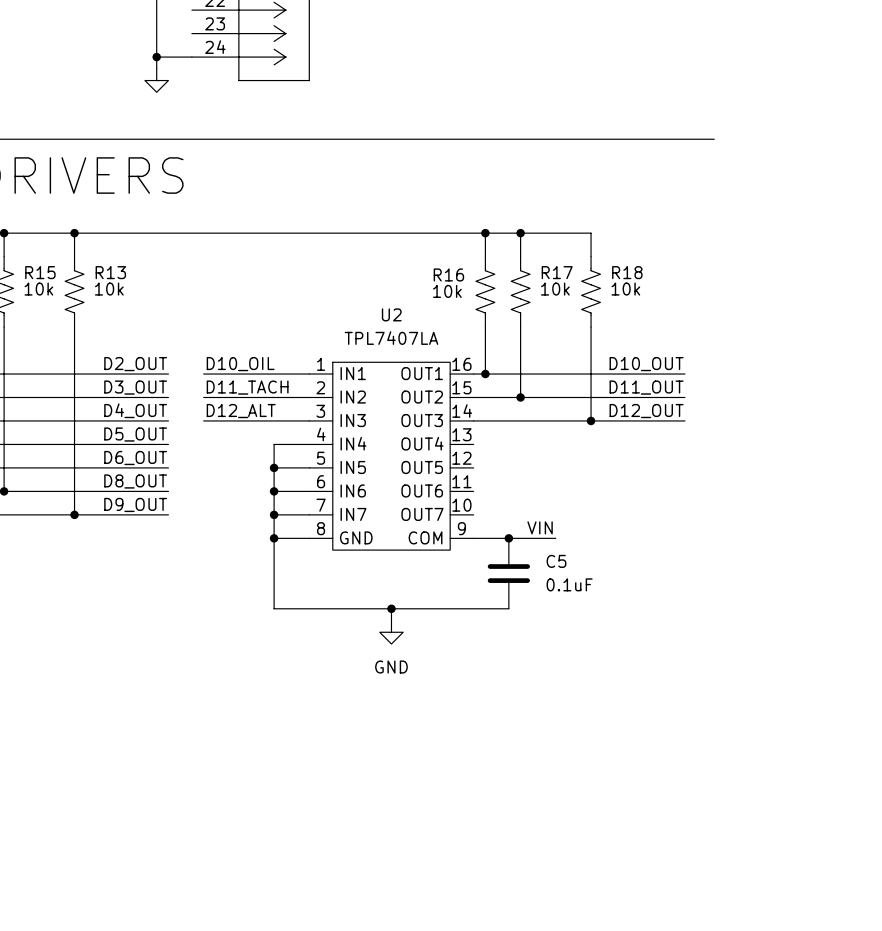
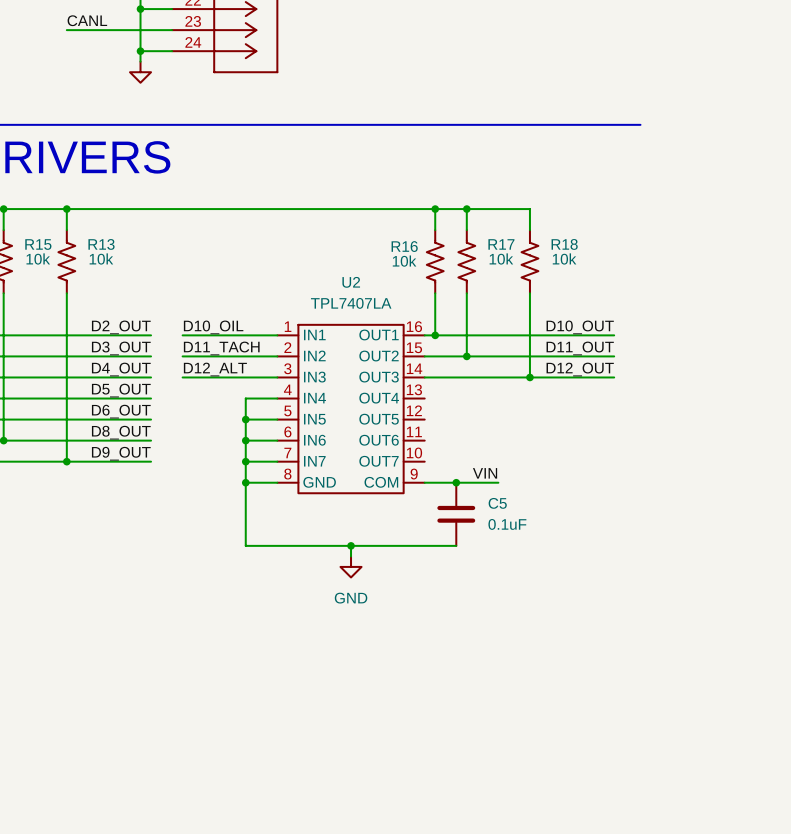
wire: none -> (140, 9) (172, 9)
junction: none -> (140, 9)
label: none -> CANL (87, 20)
wire: none -> (66, 30) (172, 30)

